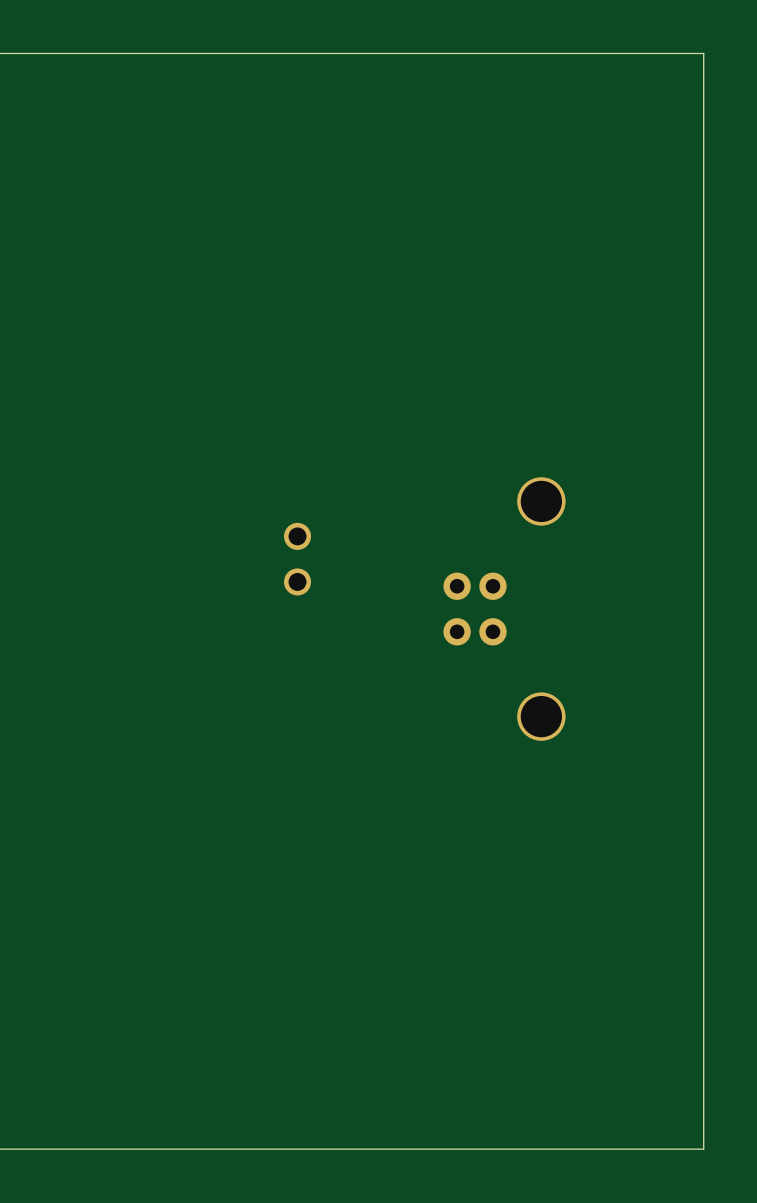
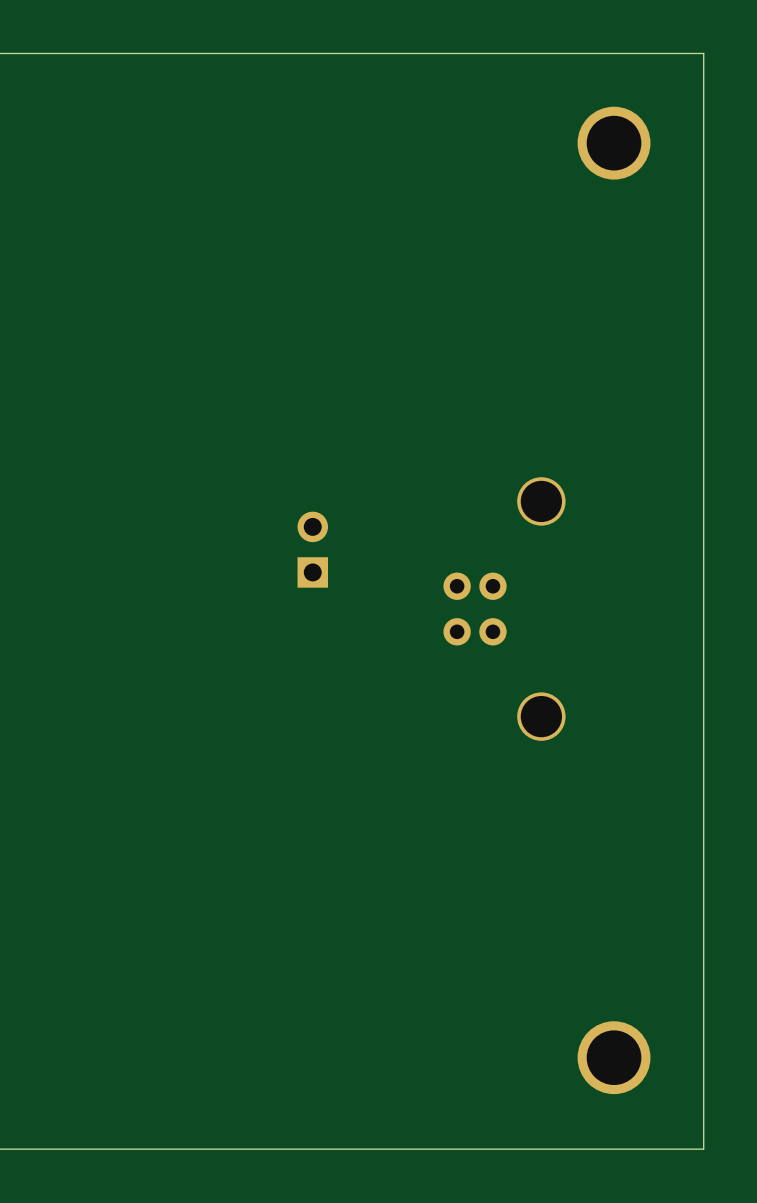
part: none -> (614, 143)
part: none -> (312, 549)
part: (297, 559) -> none
part: none -> (614, 1057)

